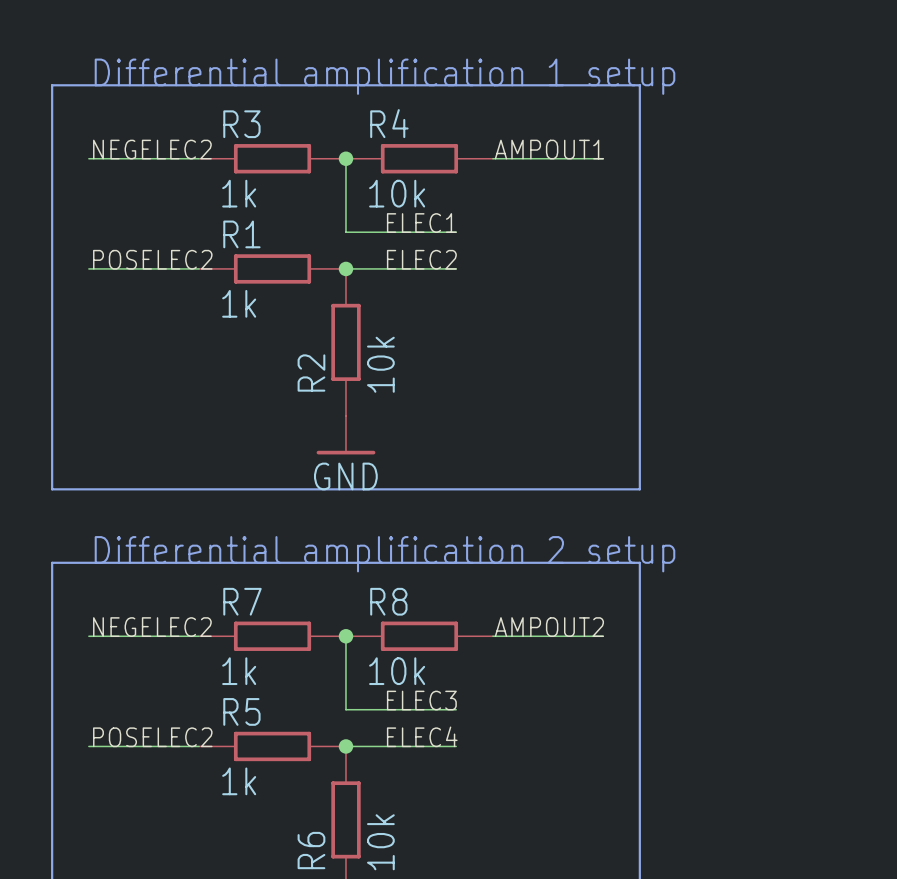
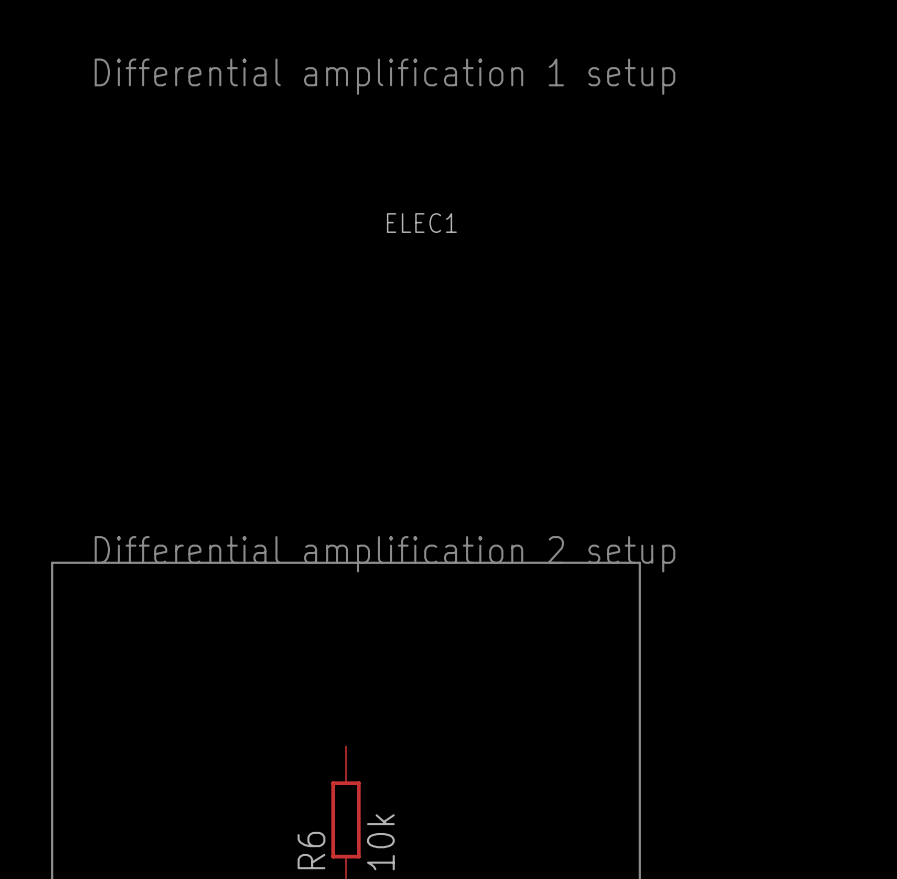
line: (52, 85) (52, 489) (639, 489) (639, 85) (52, 85) -> none
label: NEGELEC2 (152, 149) -> none
label: AMPOUT1 (549, 149) -> none
wire: (88, 158) (199, 158) -> none
R3: 1k (272, 158) -> none
wire: (345, 158) (345, 232) (456, 232) -> none
junction: (345, 158) -> none
R4: 10k (419, 158) -> none
wire: (492, 158) (603, 158) -> none
label: POSELEC2 (152, 259) -> none
label: ELEC2 (421, 259) -> none
wire: (88, 268) (199, 268) -> none
R1: 1k (272, 268) -> none
wire: (345, 268) (456, 268) -> none
junction: (345, 268) -> none
R2: 10k (345, 342) -> none
power symbol: GND (345, 435) -> none
label: NEGELEC2 (152, 627) -> none
label: AMPOUT2 (549, 627) -> none
wire: (88, 636) (199, 636) -> none
R7: 1k (272, 636) -> none
wire: (345, 636) (345, 709) (456, 709) -> none
junction: (345, 636) -> none
R8: 10k (419, 636) -> none
wire: (492, 636) (603, 636) -> none
label: ELEC3 (421, 700) -> none
label: ELEC4 (422, 736) -> none
label: POSELEC2 (152, 737) -> none
wire: (88, 746) (199, 746) -> none
R5: 1k (272, 746) -> none
wire: (345, 746) (456, 746) -> none
junction: (345, 746) -> none

